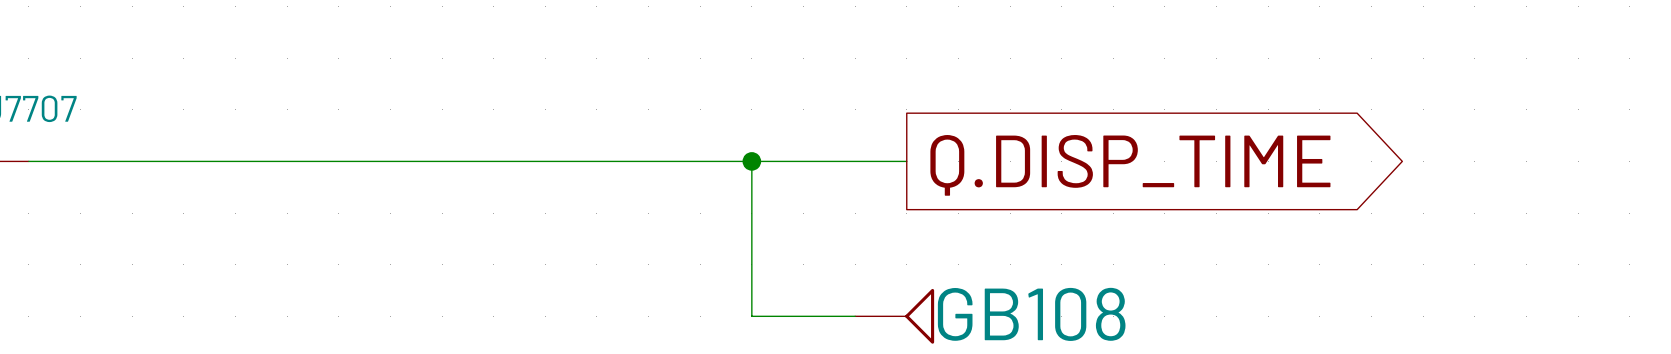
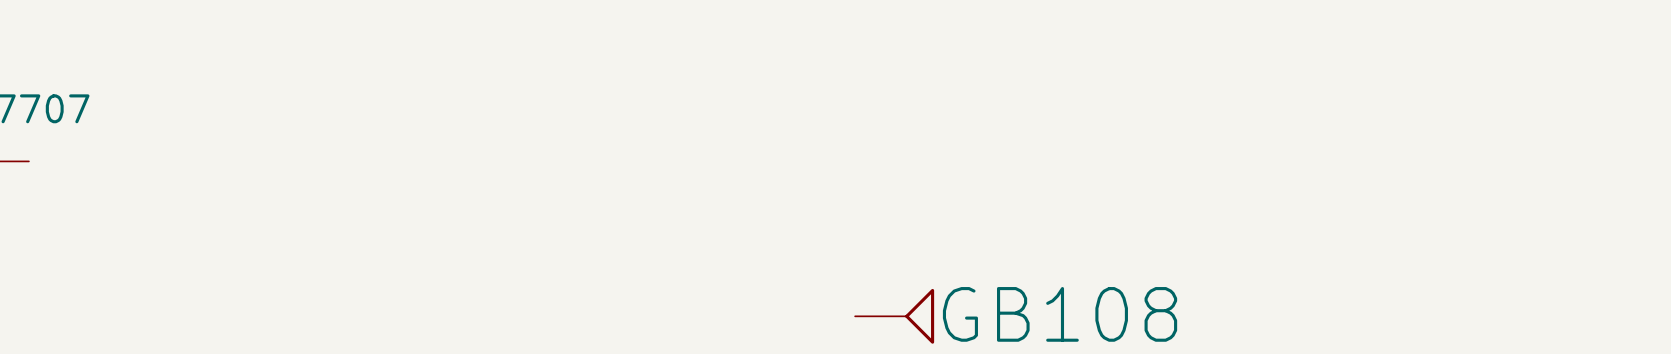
wire: (28, 161) (906, 161) -> none
wire: (751, 161) (751, 316) (855, 316) -> none
junction: (751, 161) -> none
global label: Q.DISP_TIME (1130, 165) -> none

